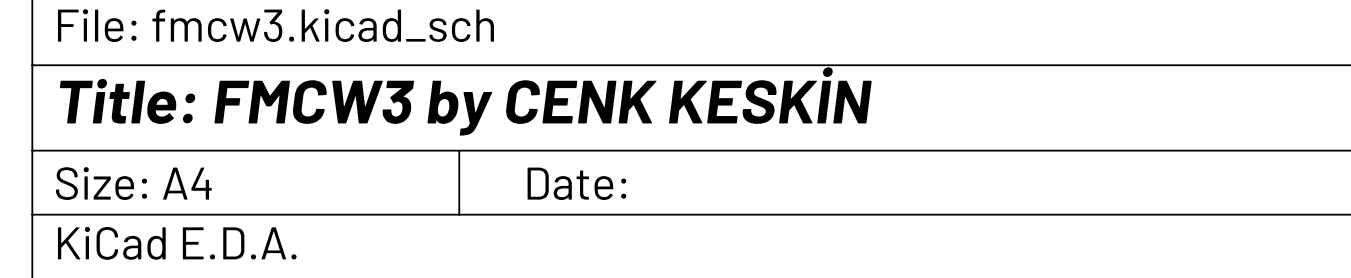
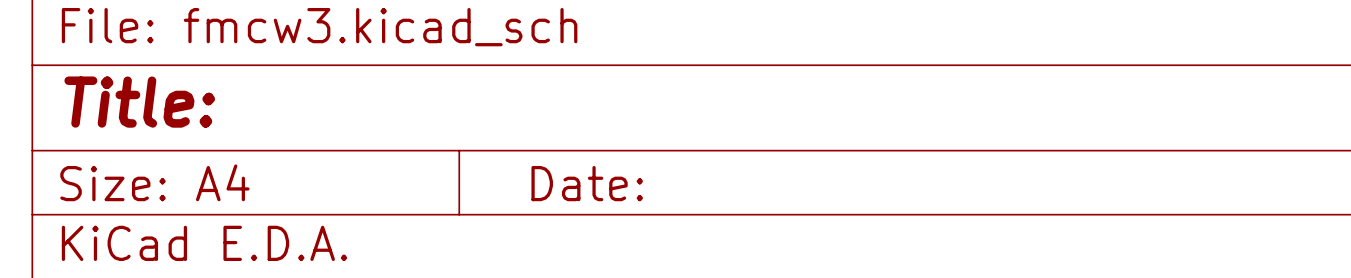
title block: Title: FMCW3 by CENK KESKİN (465, 101) -> Title: (139, 102)

